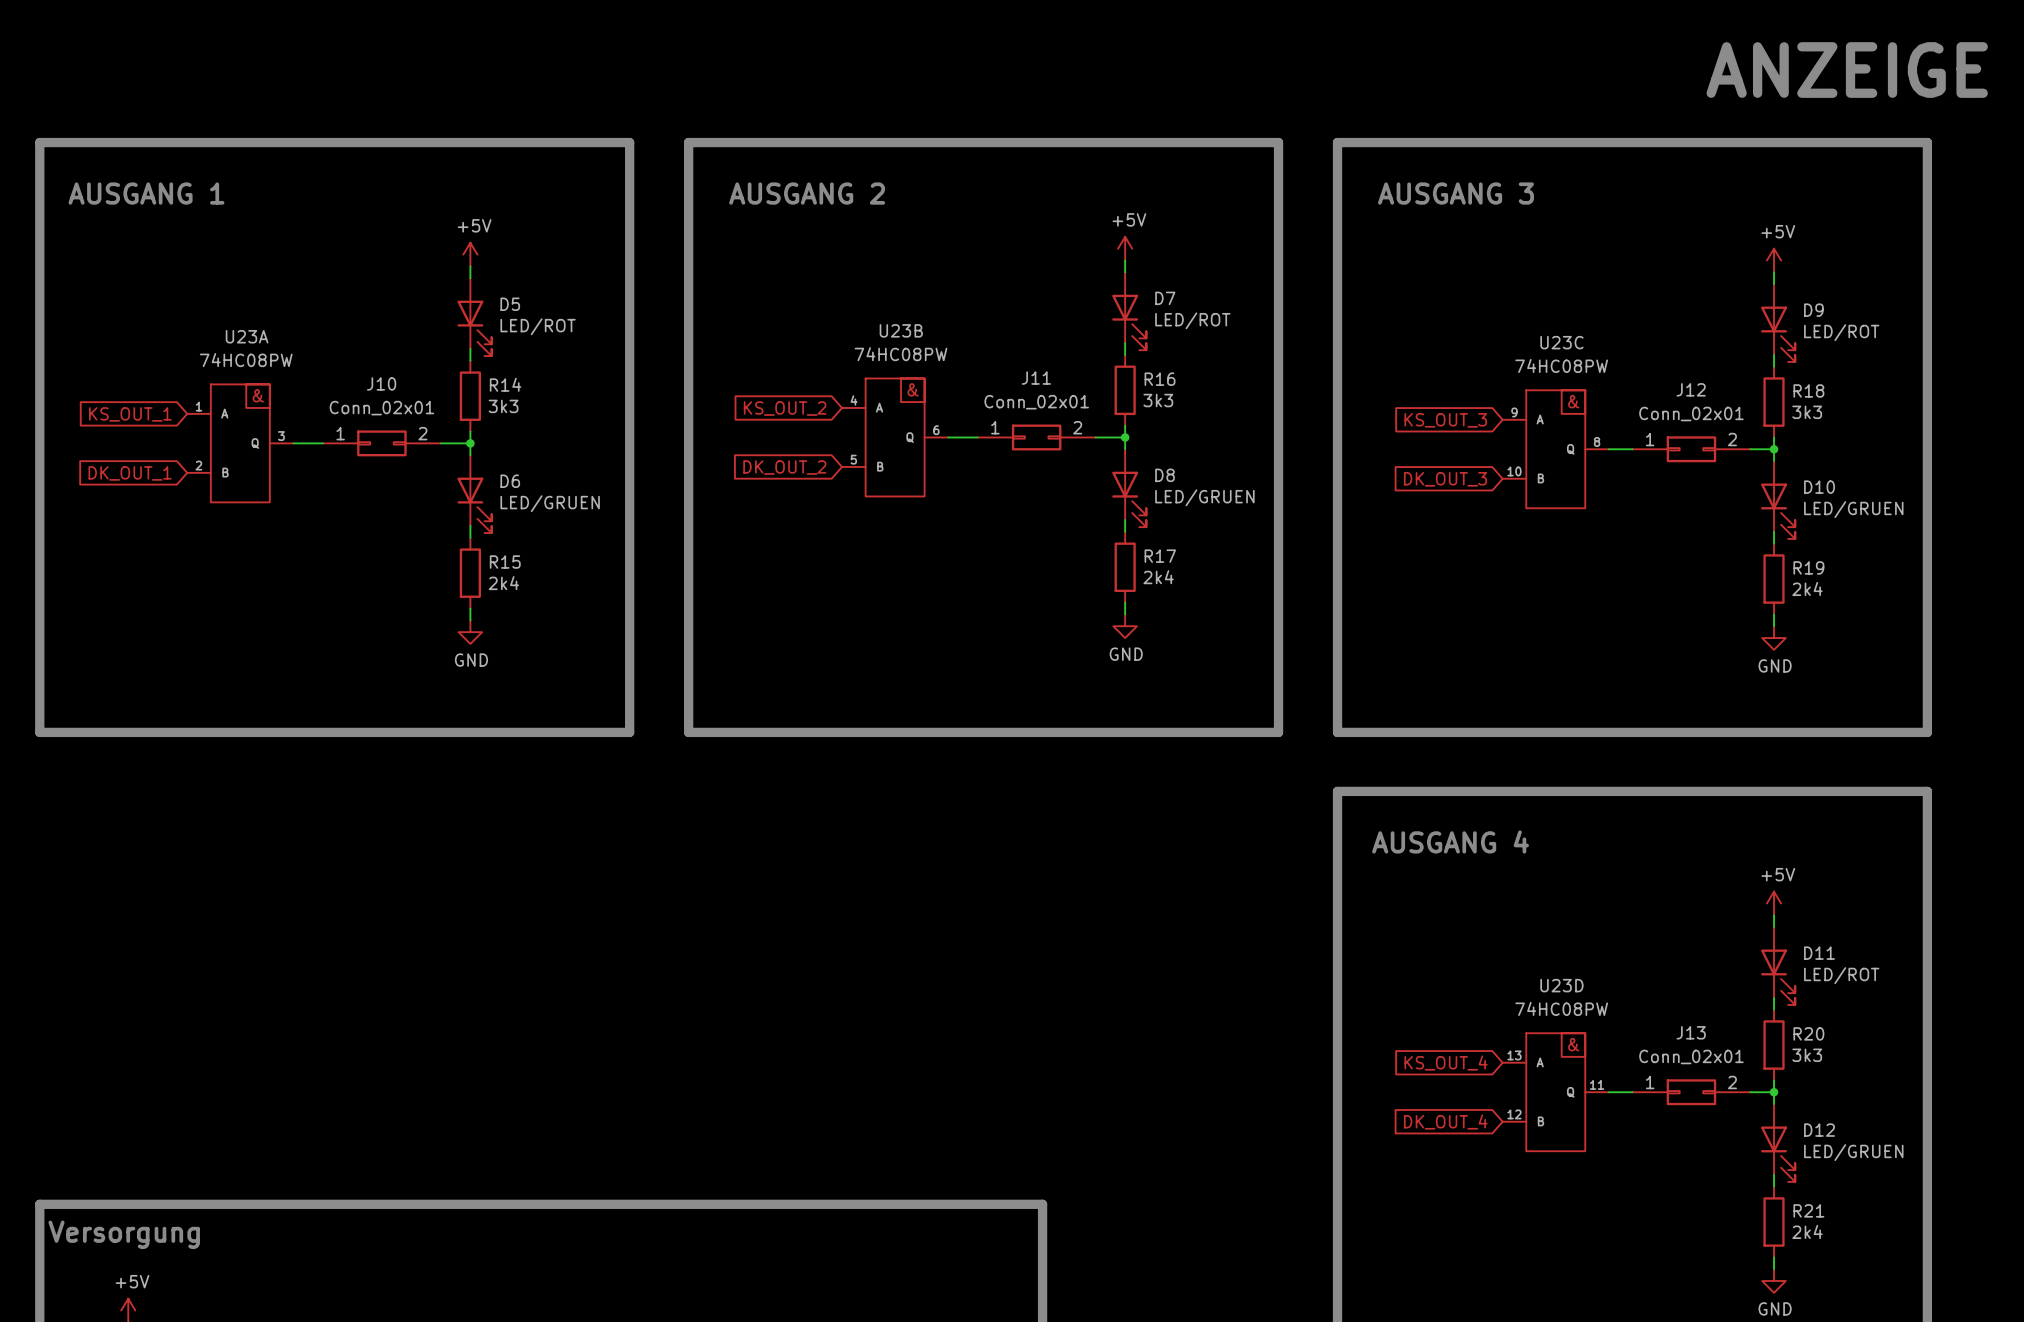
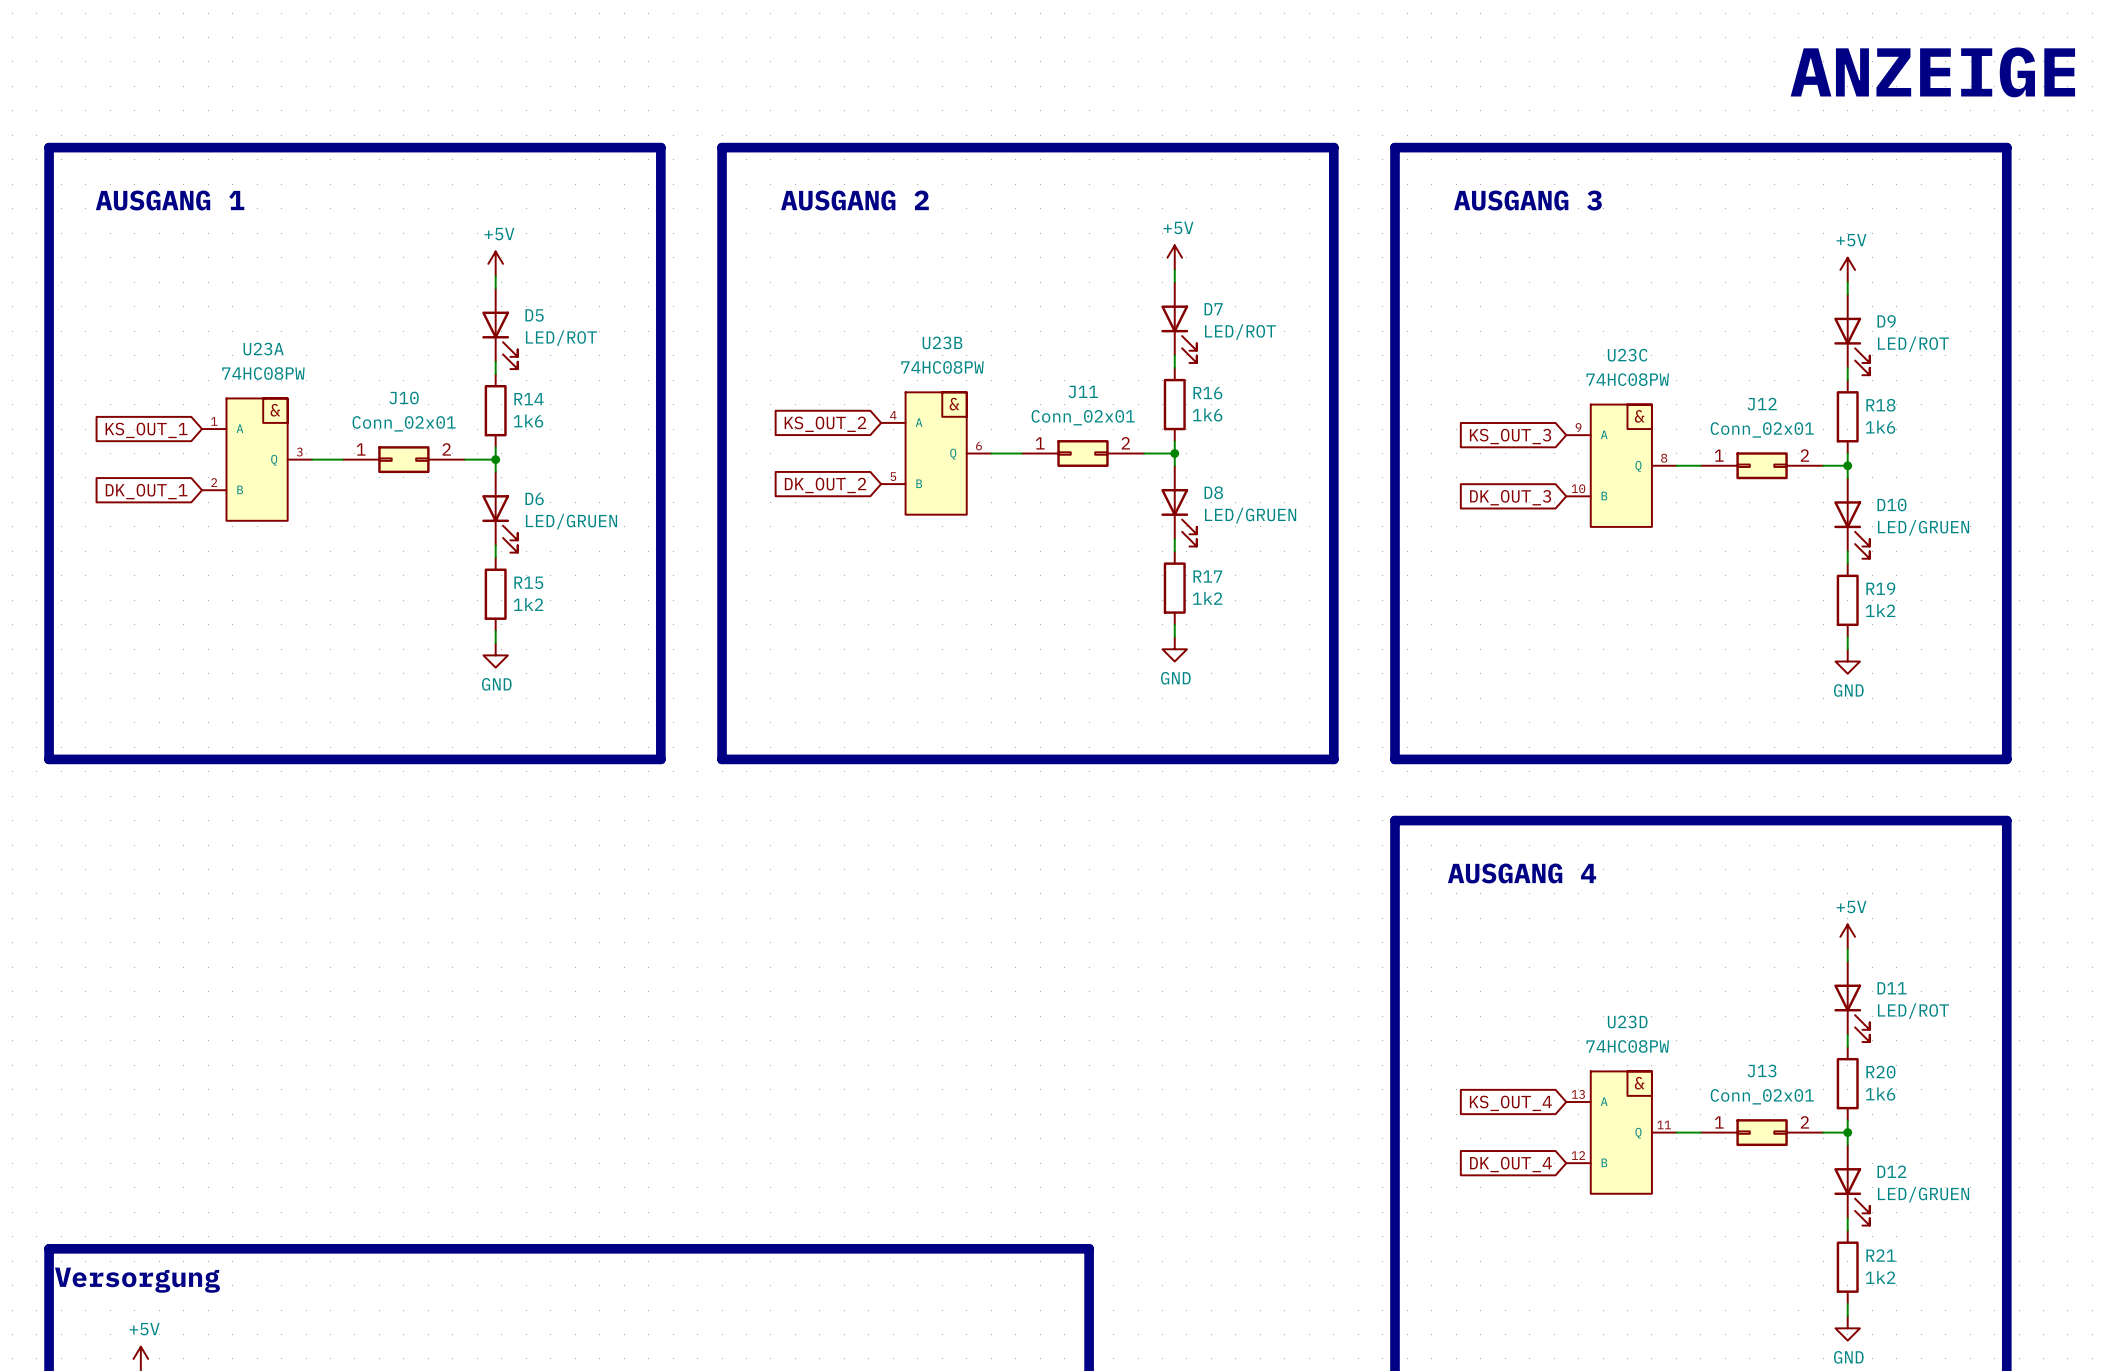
R16 value: 3k3 (1158, 400) -> 1k6 (1207, 414)
R14 value: 3k3 (503, 406) -> 1k6 (528, 421)
R18 value: 3k3 (1807, 412) -> 1k6 (1880, 427)
R17 value: 2k4 (1158, 577) -> 1k2 (1207, 598)
R15 value: 2k4 (503, 583) -> 1k2 (528, 604)
R19 value: 2k4 (1807, 589) -> 1k2 (1880, 610)
R20 value: 3k3 (1807, 1055) -> 1k6 (1880, 1093)
R21 value: 2k4 (1807, 1231) -> 1k2 (1880, 1277)

